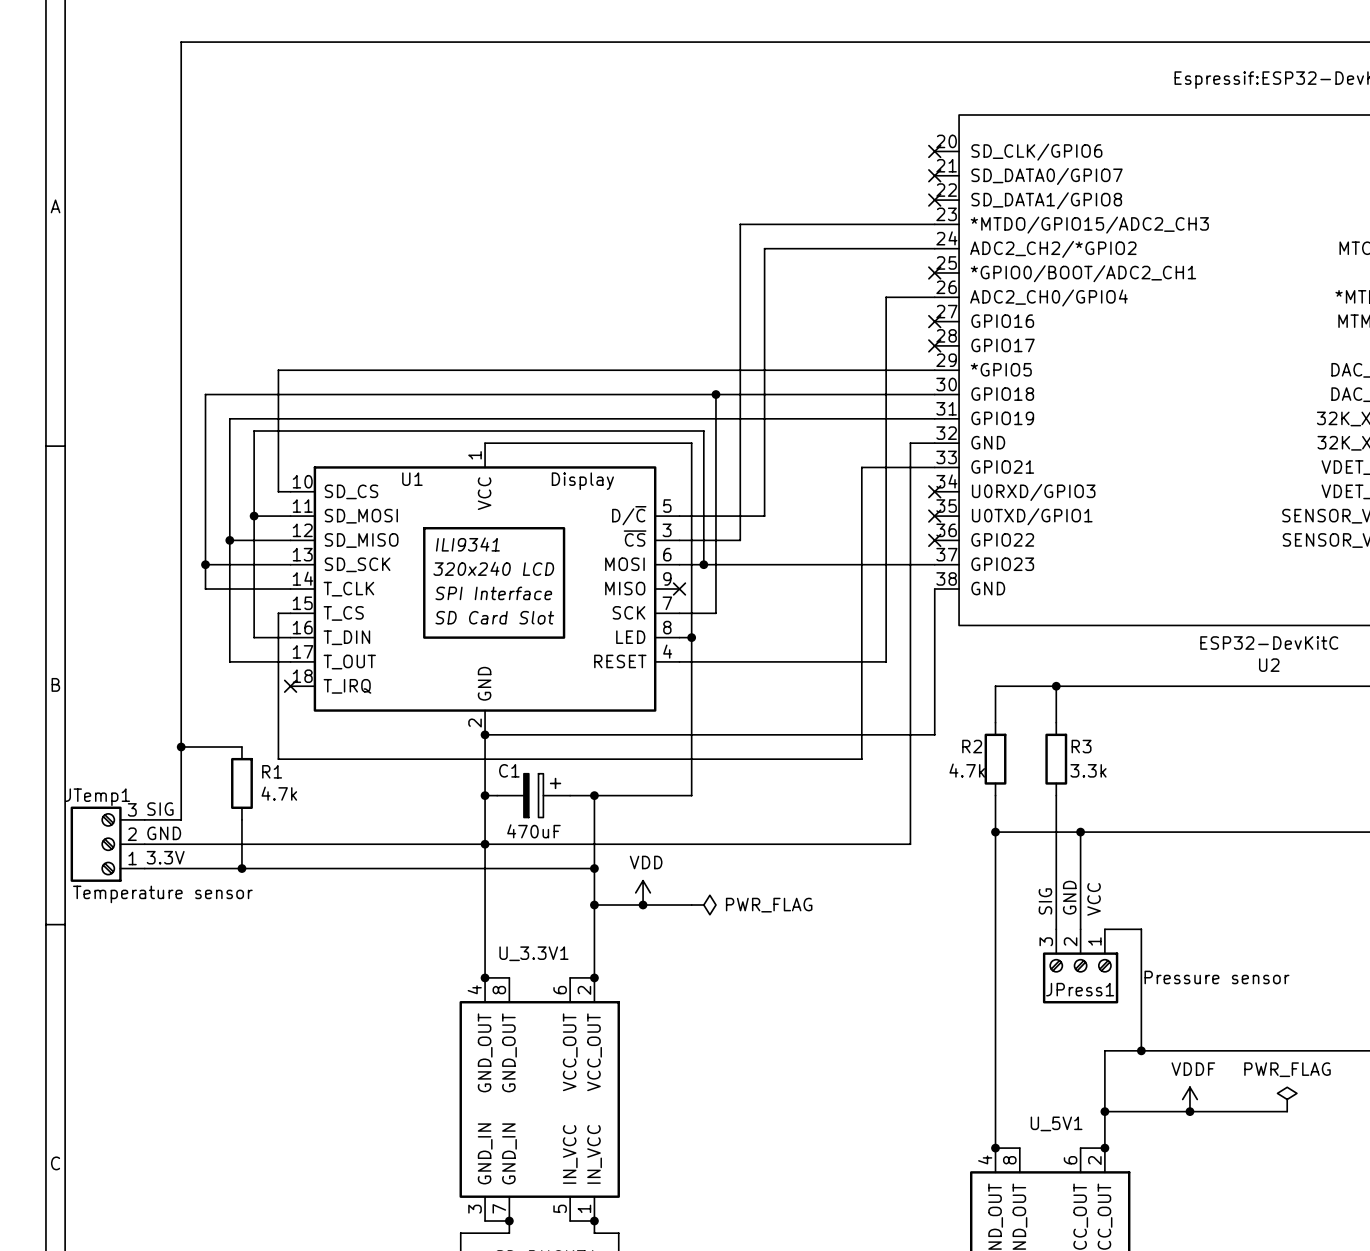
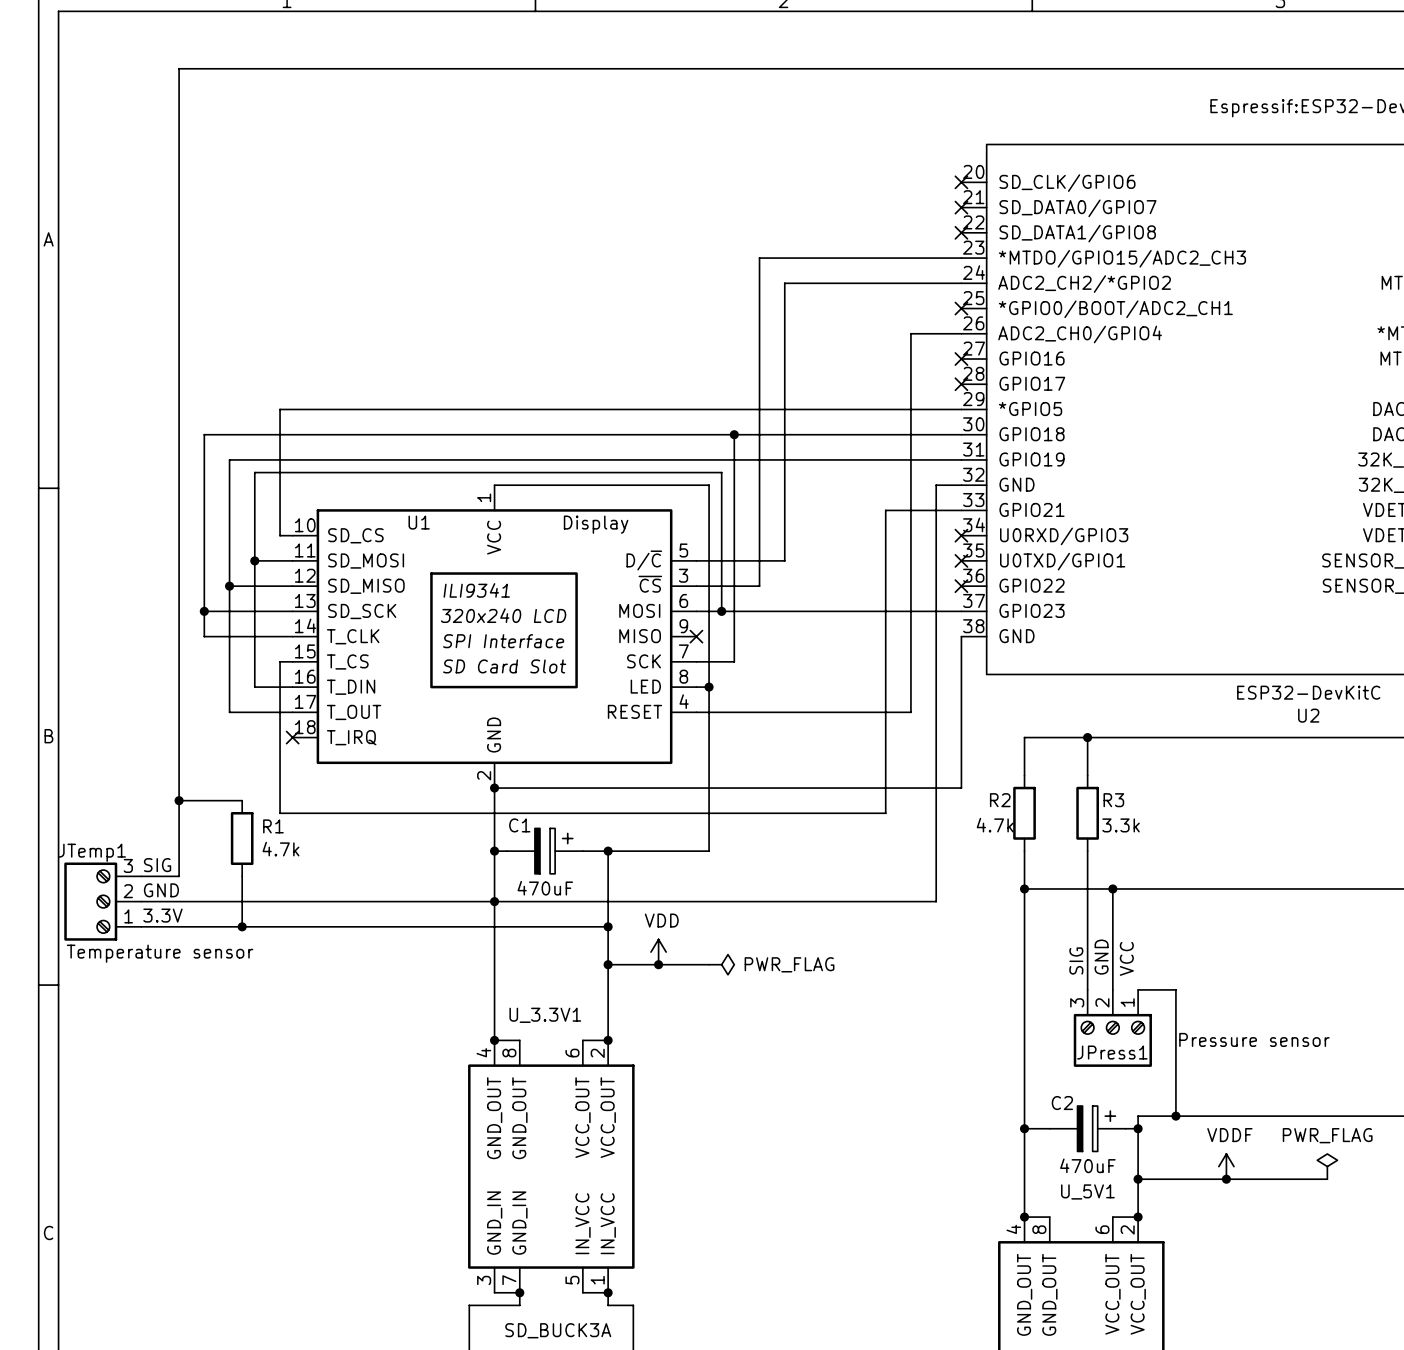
wire: none -> (1024, 1128) (1049, 1128)
junction: none -> (1024, 1128)
C2: none -> 470uF (1087, 1128)
wire: none -> (1125, 1128) (1138, 1128)
junction: none -> (1138, 1128)

